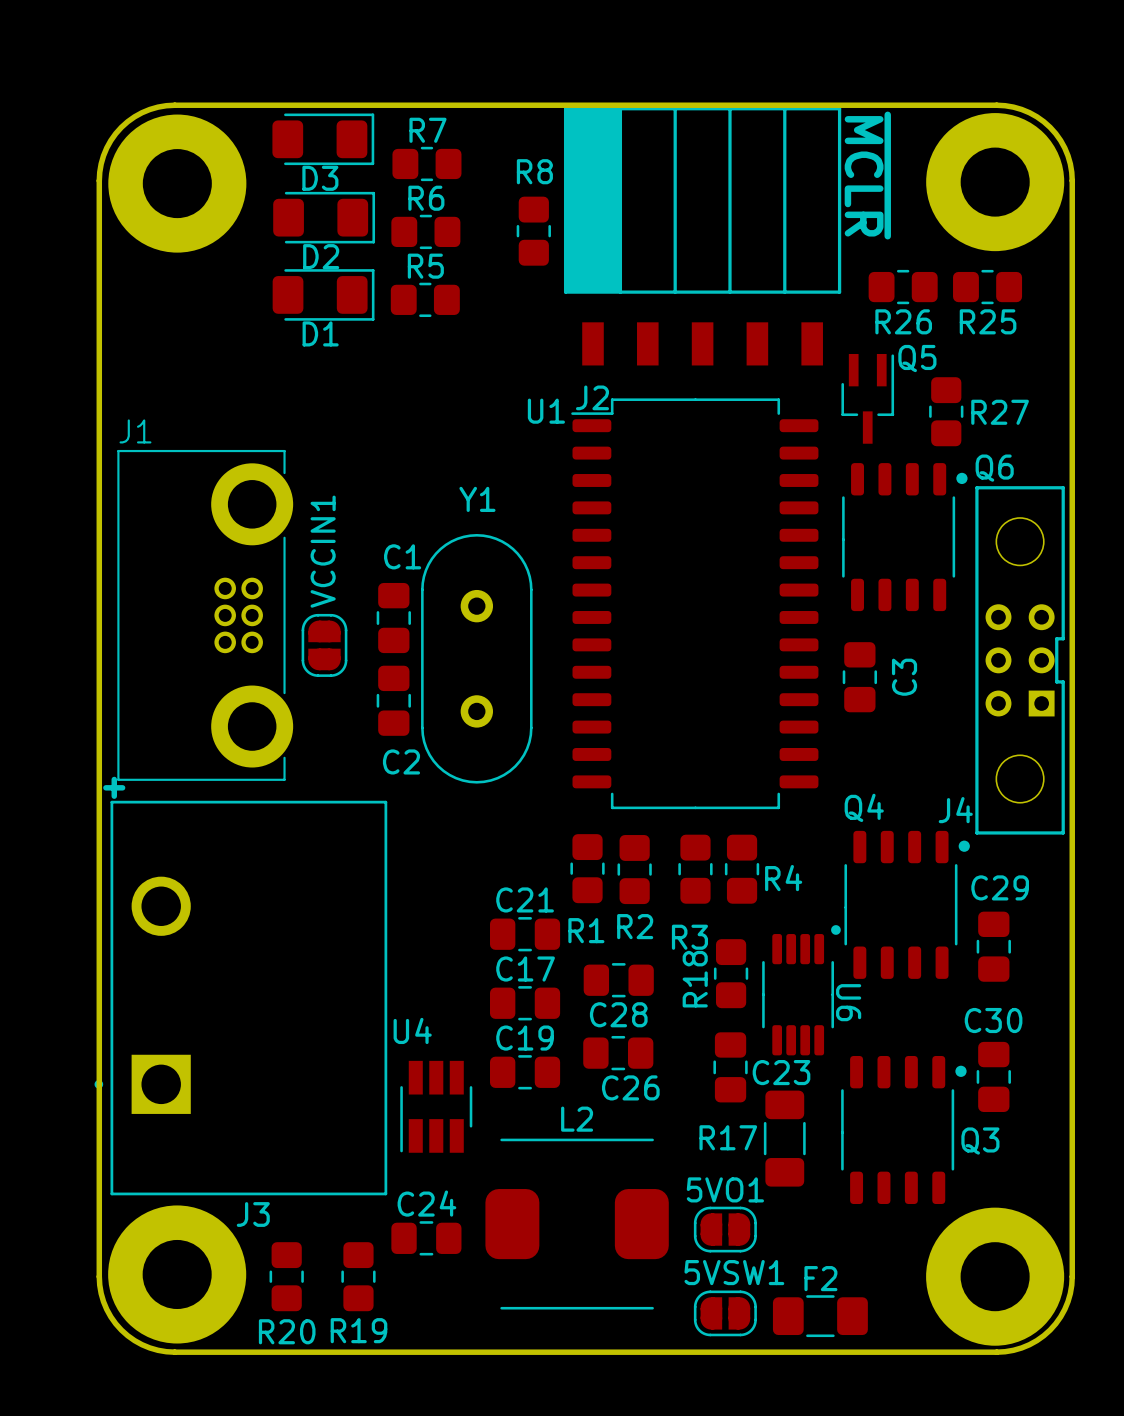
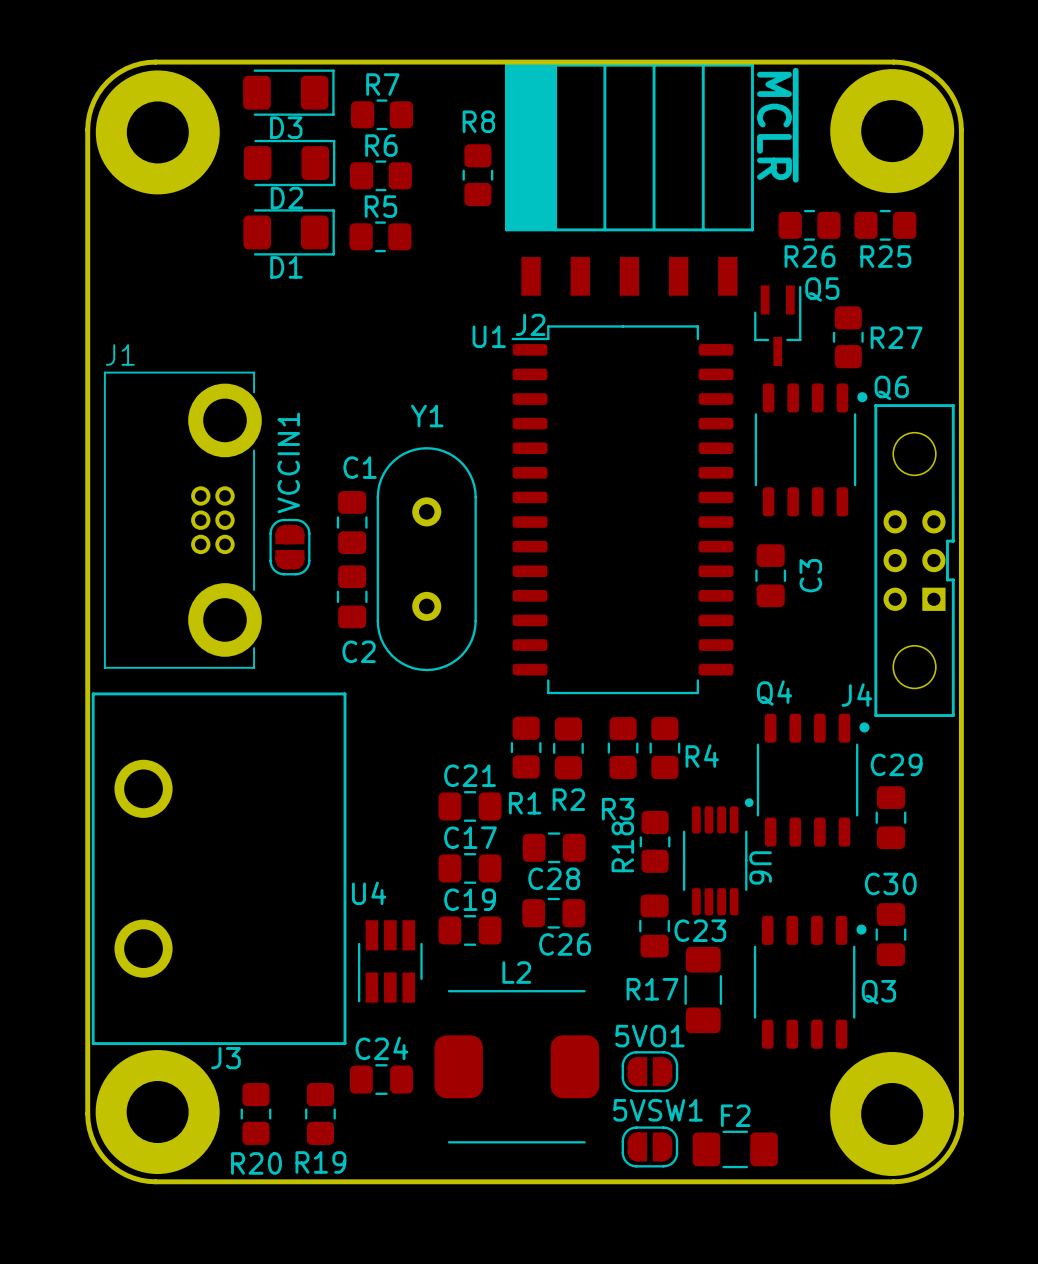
text: + (114, 787) -> none
J3 footprint: [94, 800, 388, 1196] -> [91, 692, 347, 1046]

